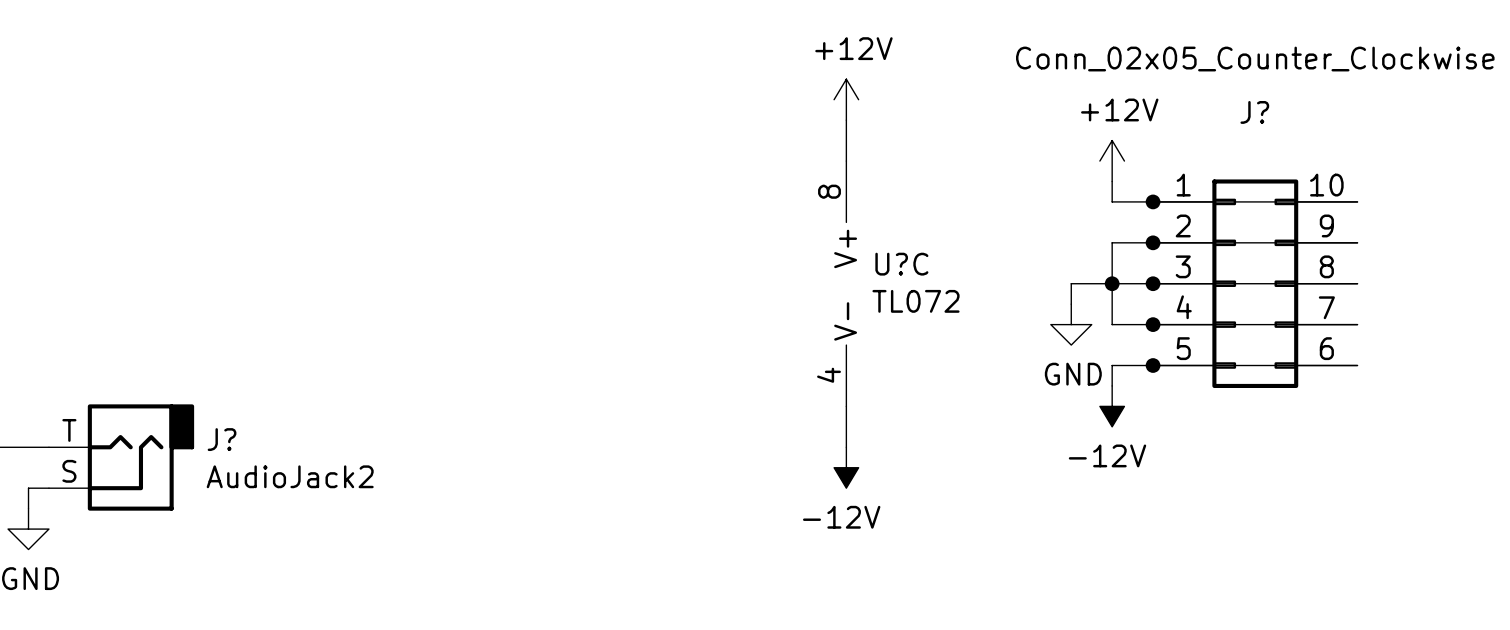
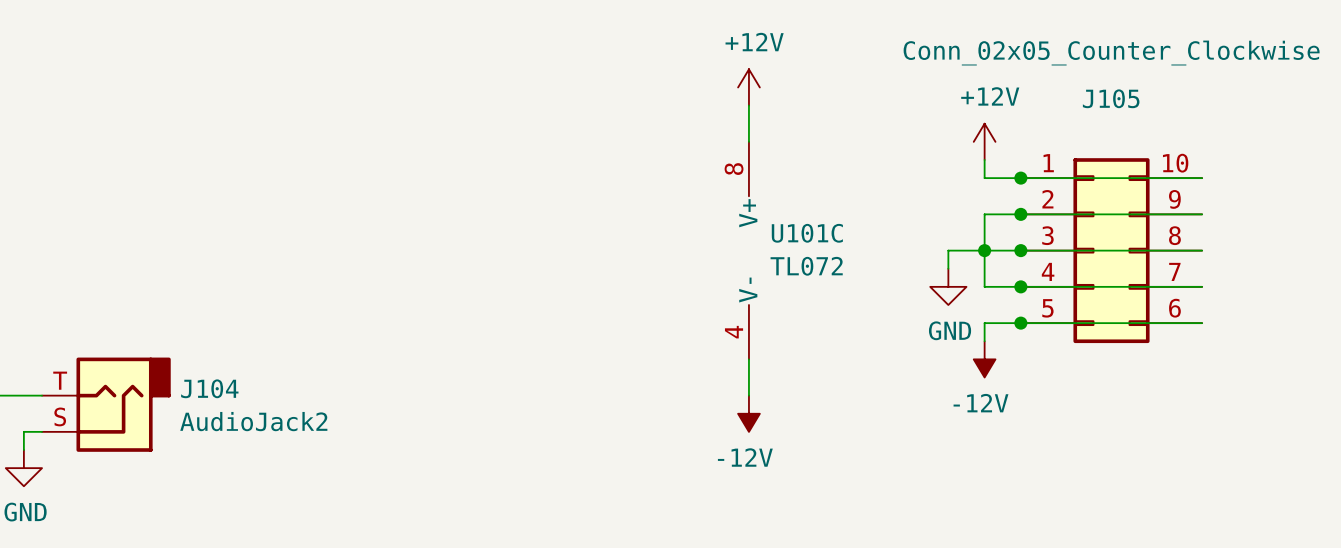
J? name: J? (1254, 112) -> J105 (1111, 98)
U?C name: U?C (901, 264) -> U101C (807, 233)
J? name: J? (222, 439) -> J104 (209, 388)

